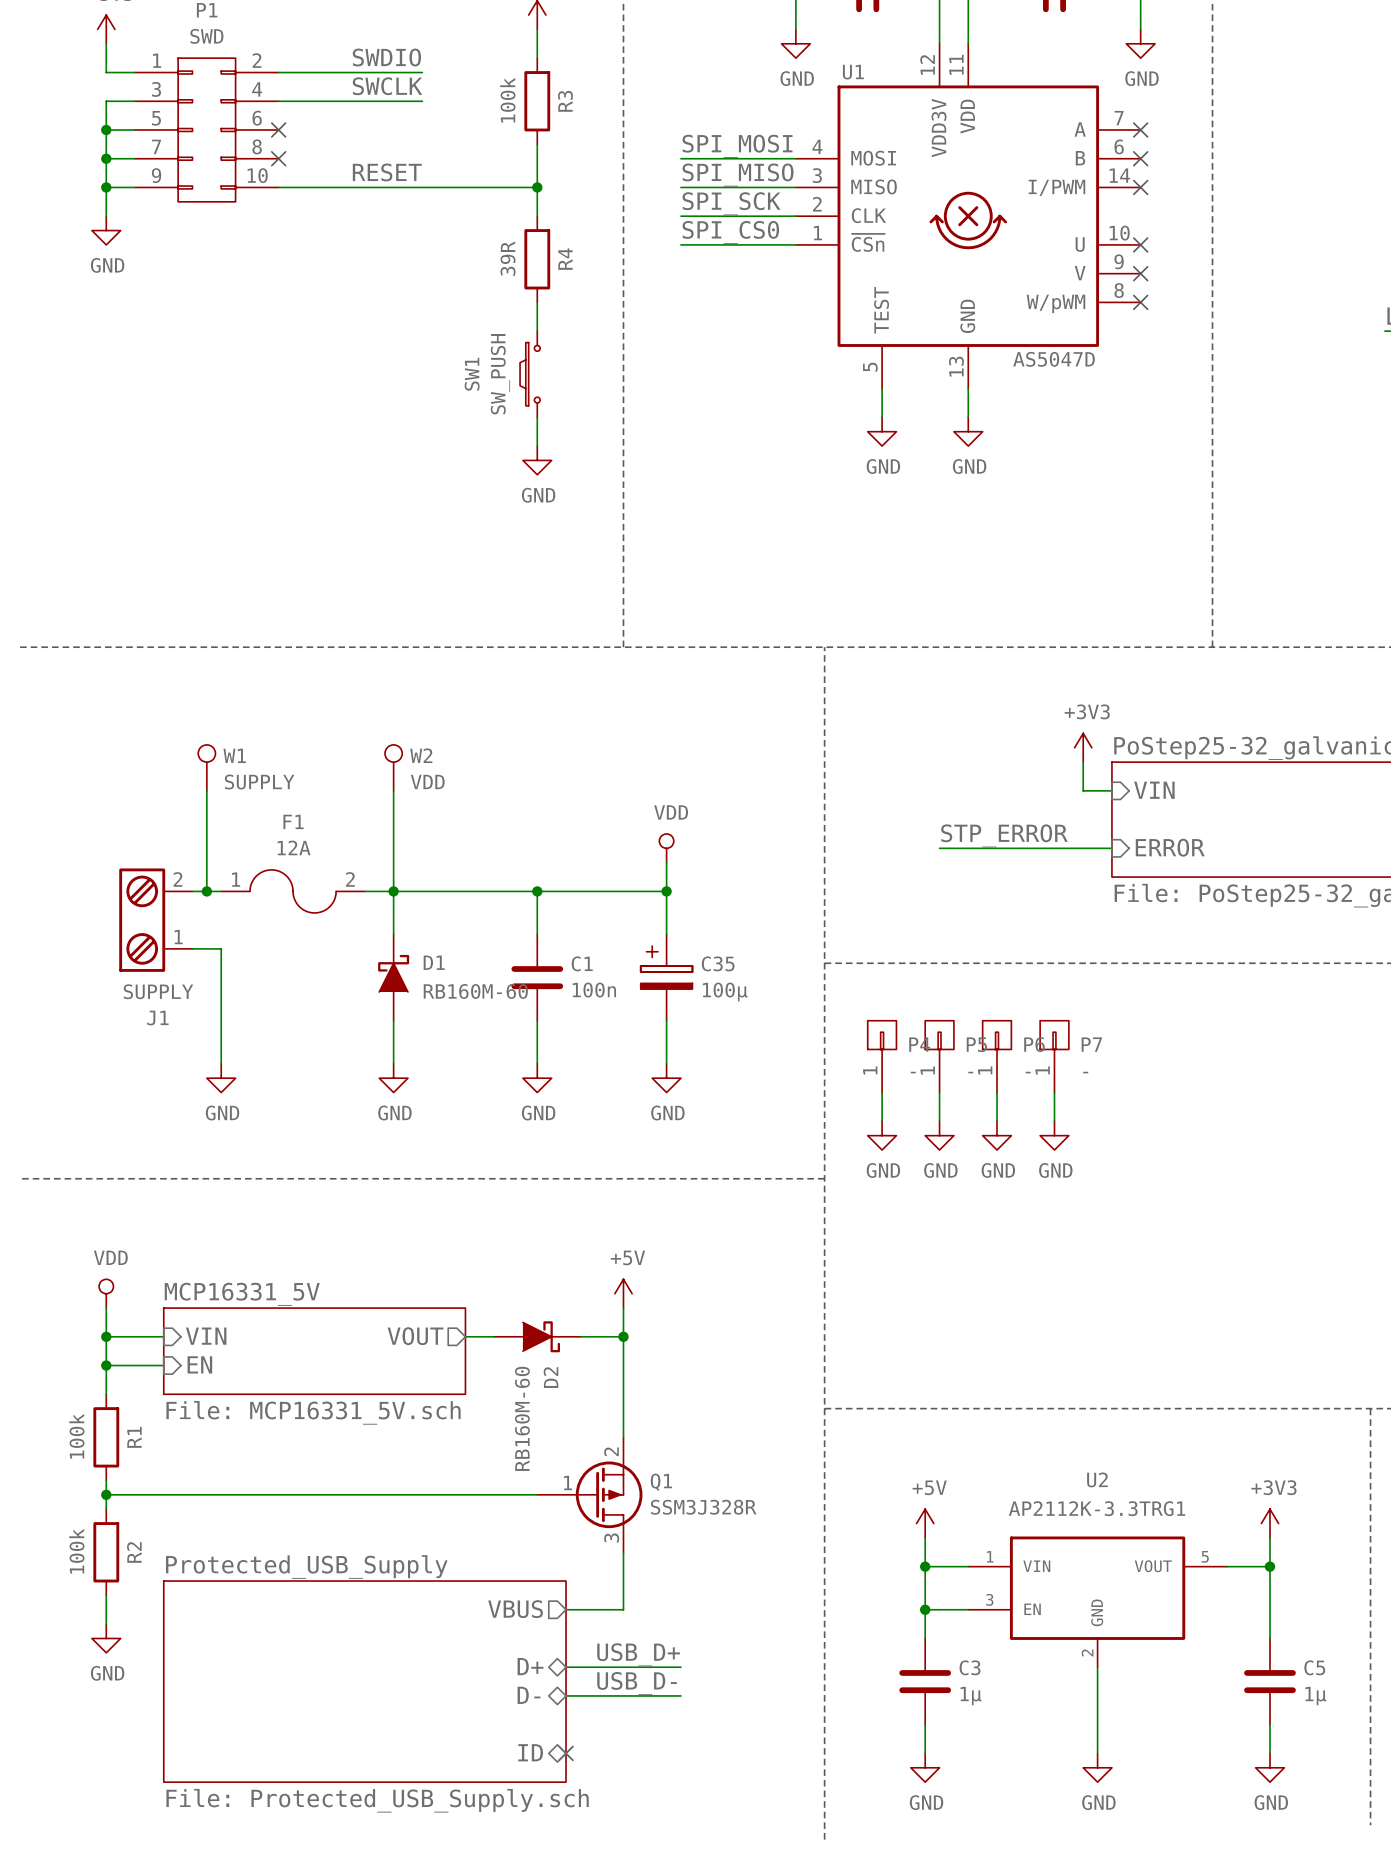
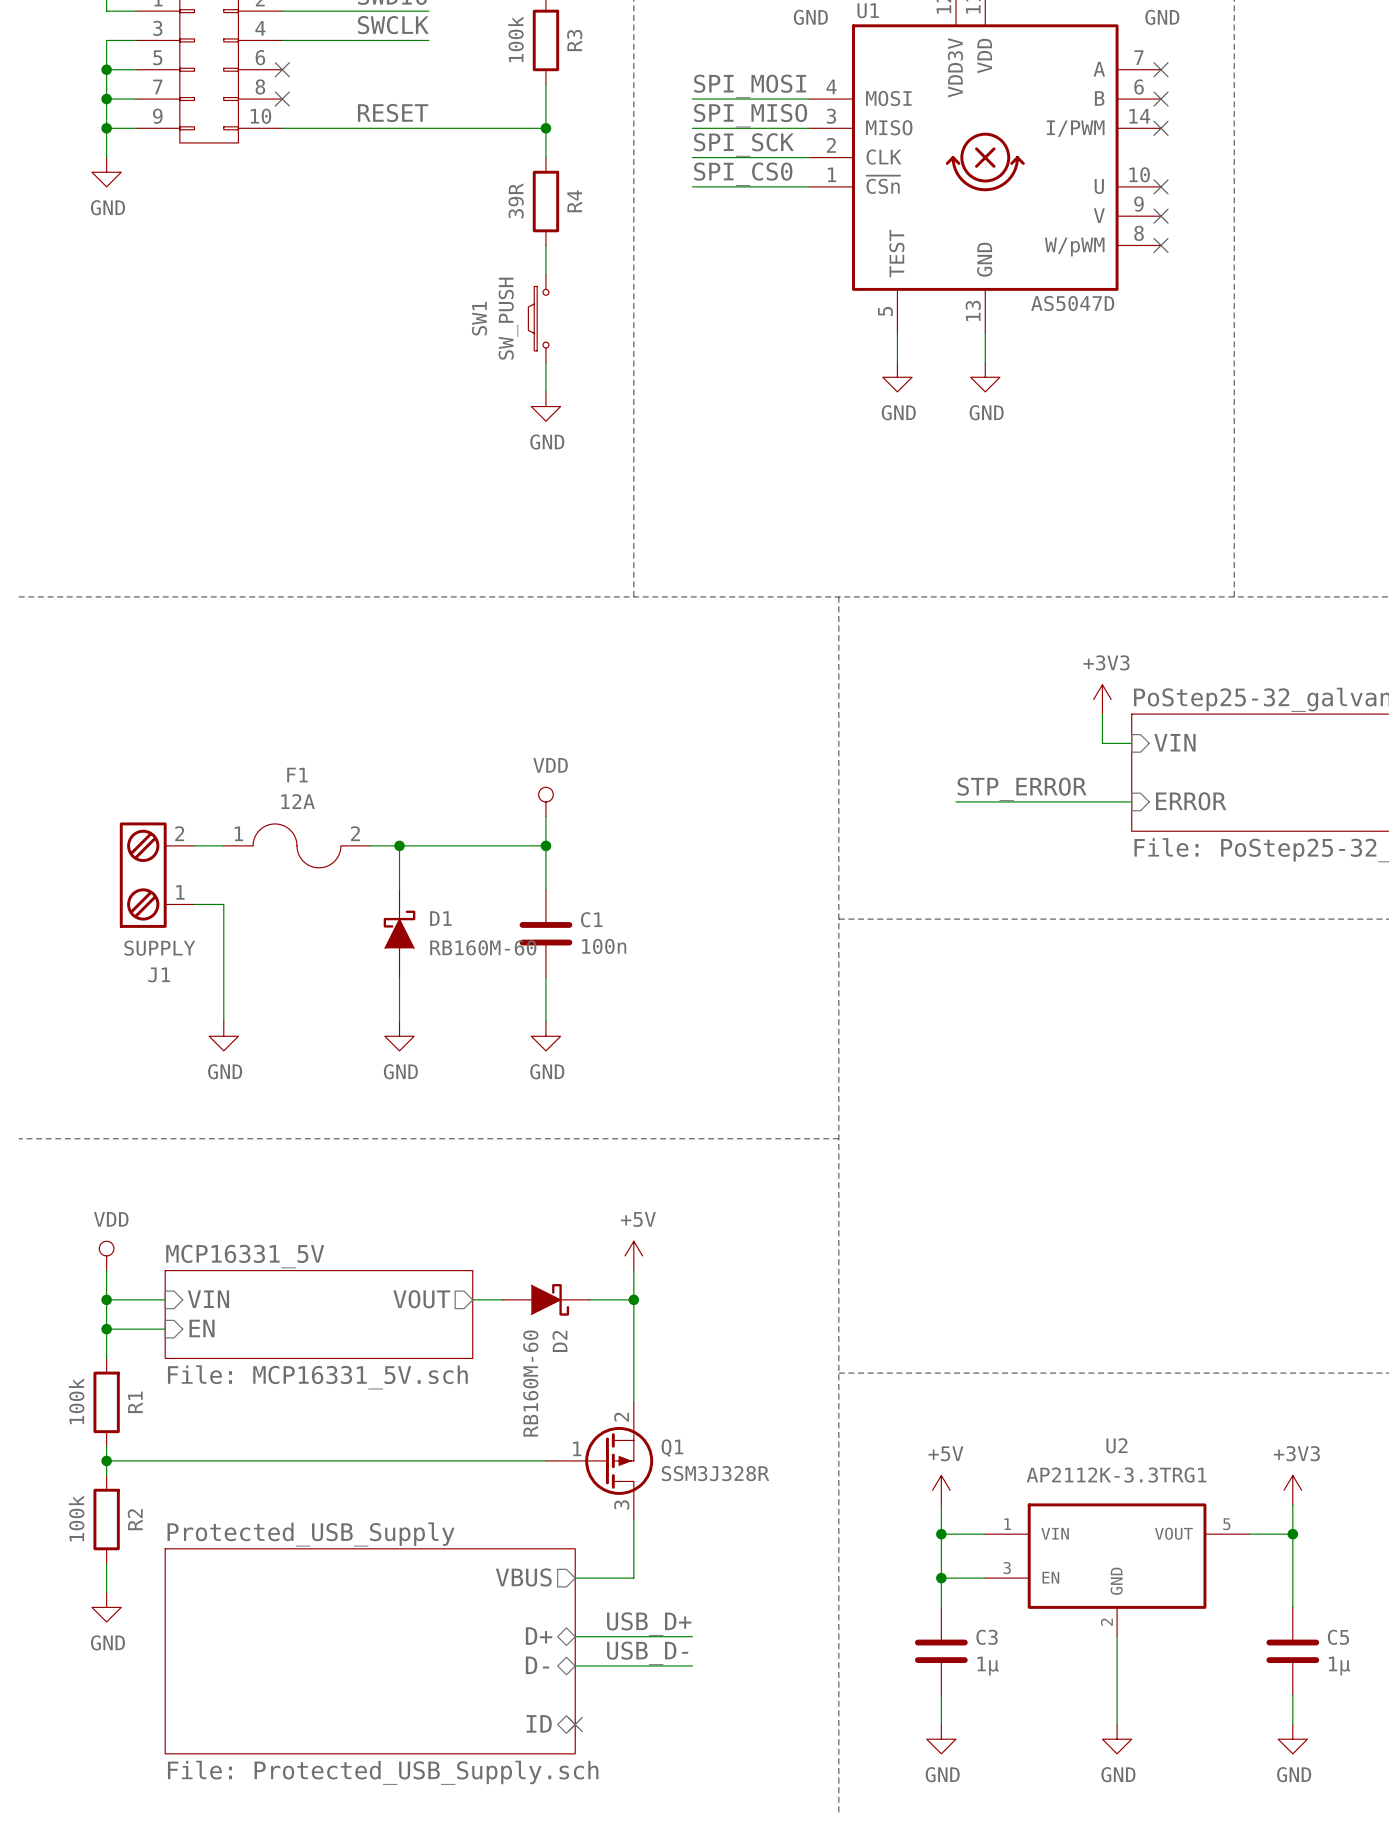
W1: SUPPLY (206, 767) -> none
W2: VDD (393, 767) -> none
wire: (206, 790) (206, 891) -> none
wire: (393, 790) (393, 891) -> none
power symbol position: VDD (666, 848) -> VDD (545, 801)
wire: (666, 862) (666, 934) -> none
junction: (206, 891) -> none
wire: (537, 891) (666, 891) -> (545, 845) (545, 816)
junction: (666, 891) -> none
C35: 100µ (666, 977) -> none
wire: (666, 1020) (666, 1063) -> none
P4: - (882, 1056) -> none
P5: - (939, 1056) -> none
P6: - (997, 1056) -> none
P7: - (1054, 1056) -> none
power symbol: GND (666, 1078) -> none
wire: (882, 1092) (882, 1121) -> none
wire: (939, 1092) (939, 1121) -> none
wire: (997, 1092) (997, 1121) -> none
wire: (1054, 1092) (1054, 1121) -> none
power symbol: GND (882, 1135) -> none
power symbol: GND (939, 1135) -> none
power symbol: GND (997, 1135) -> none
power symbol: GND (1054, 1135) -> none

